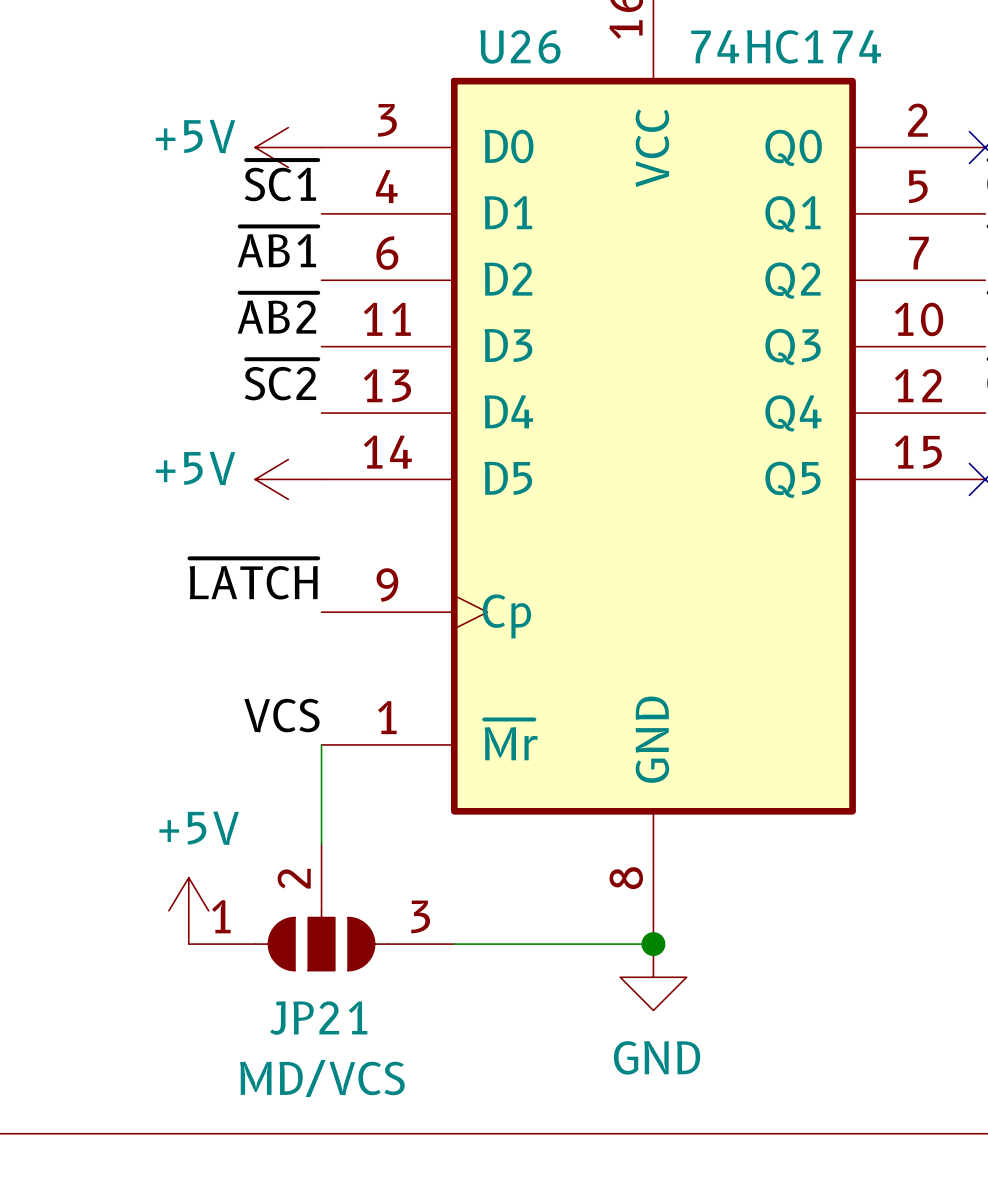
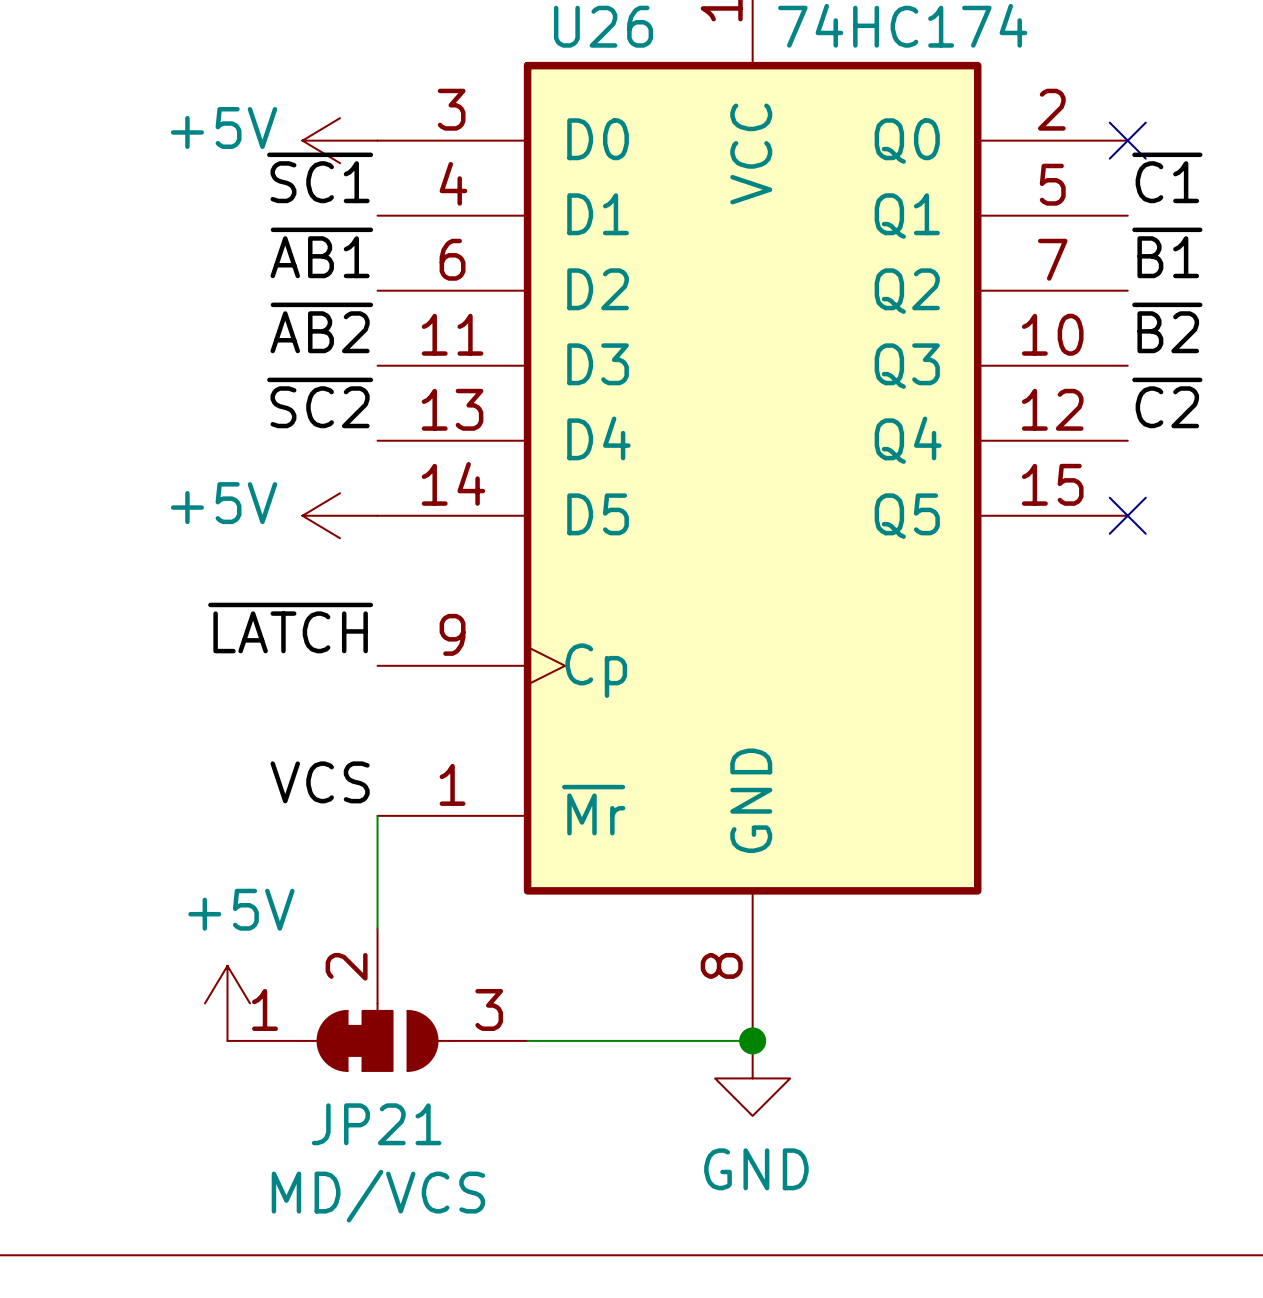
JP21 symbol: [188, 844, 455, 971] -> [227, 928, 528, 1071]

